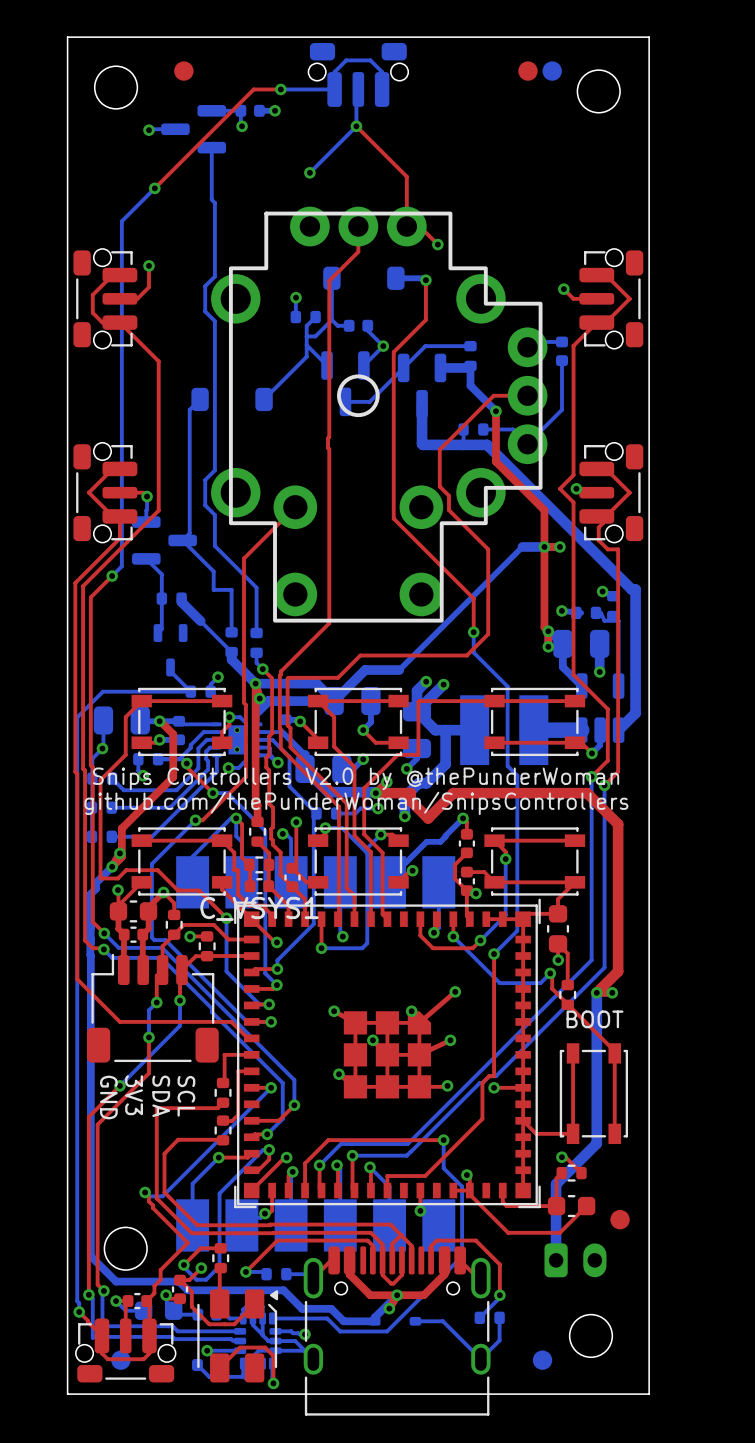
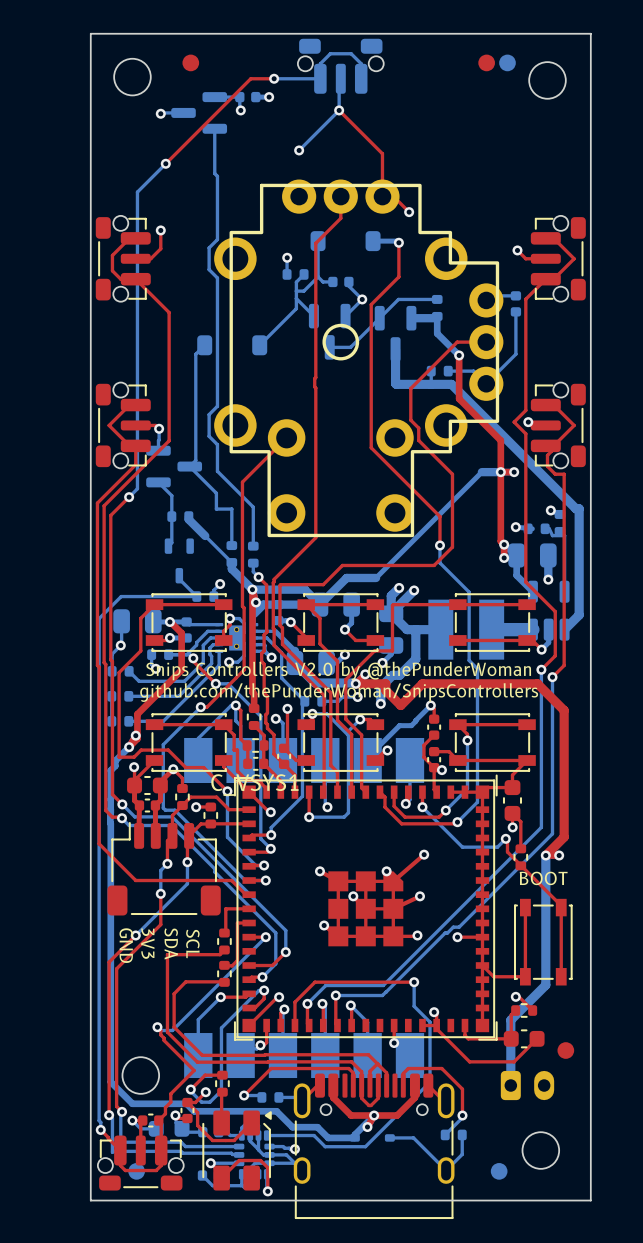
top track: (494, 954) (494, 1076) (489, 1076) (482, 1082) (482, 1118) (425, 1176) (387, 1176) (387, 1190) -> (457, 822) (455, 823) (401, 823) (384, 807) (384, 797) (379, 792)

